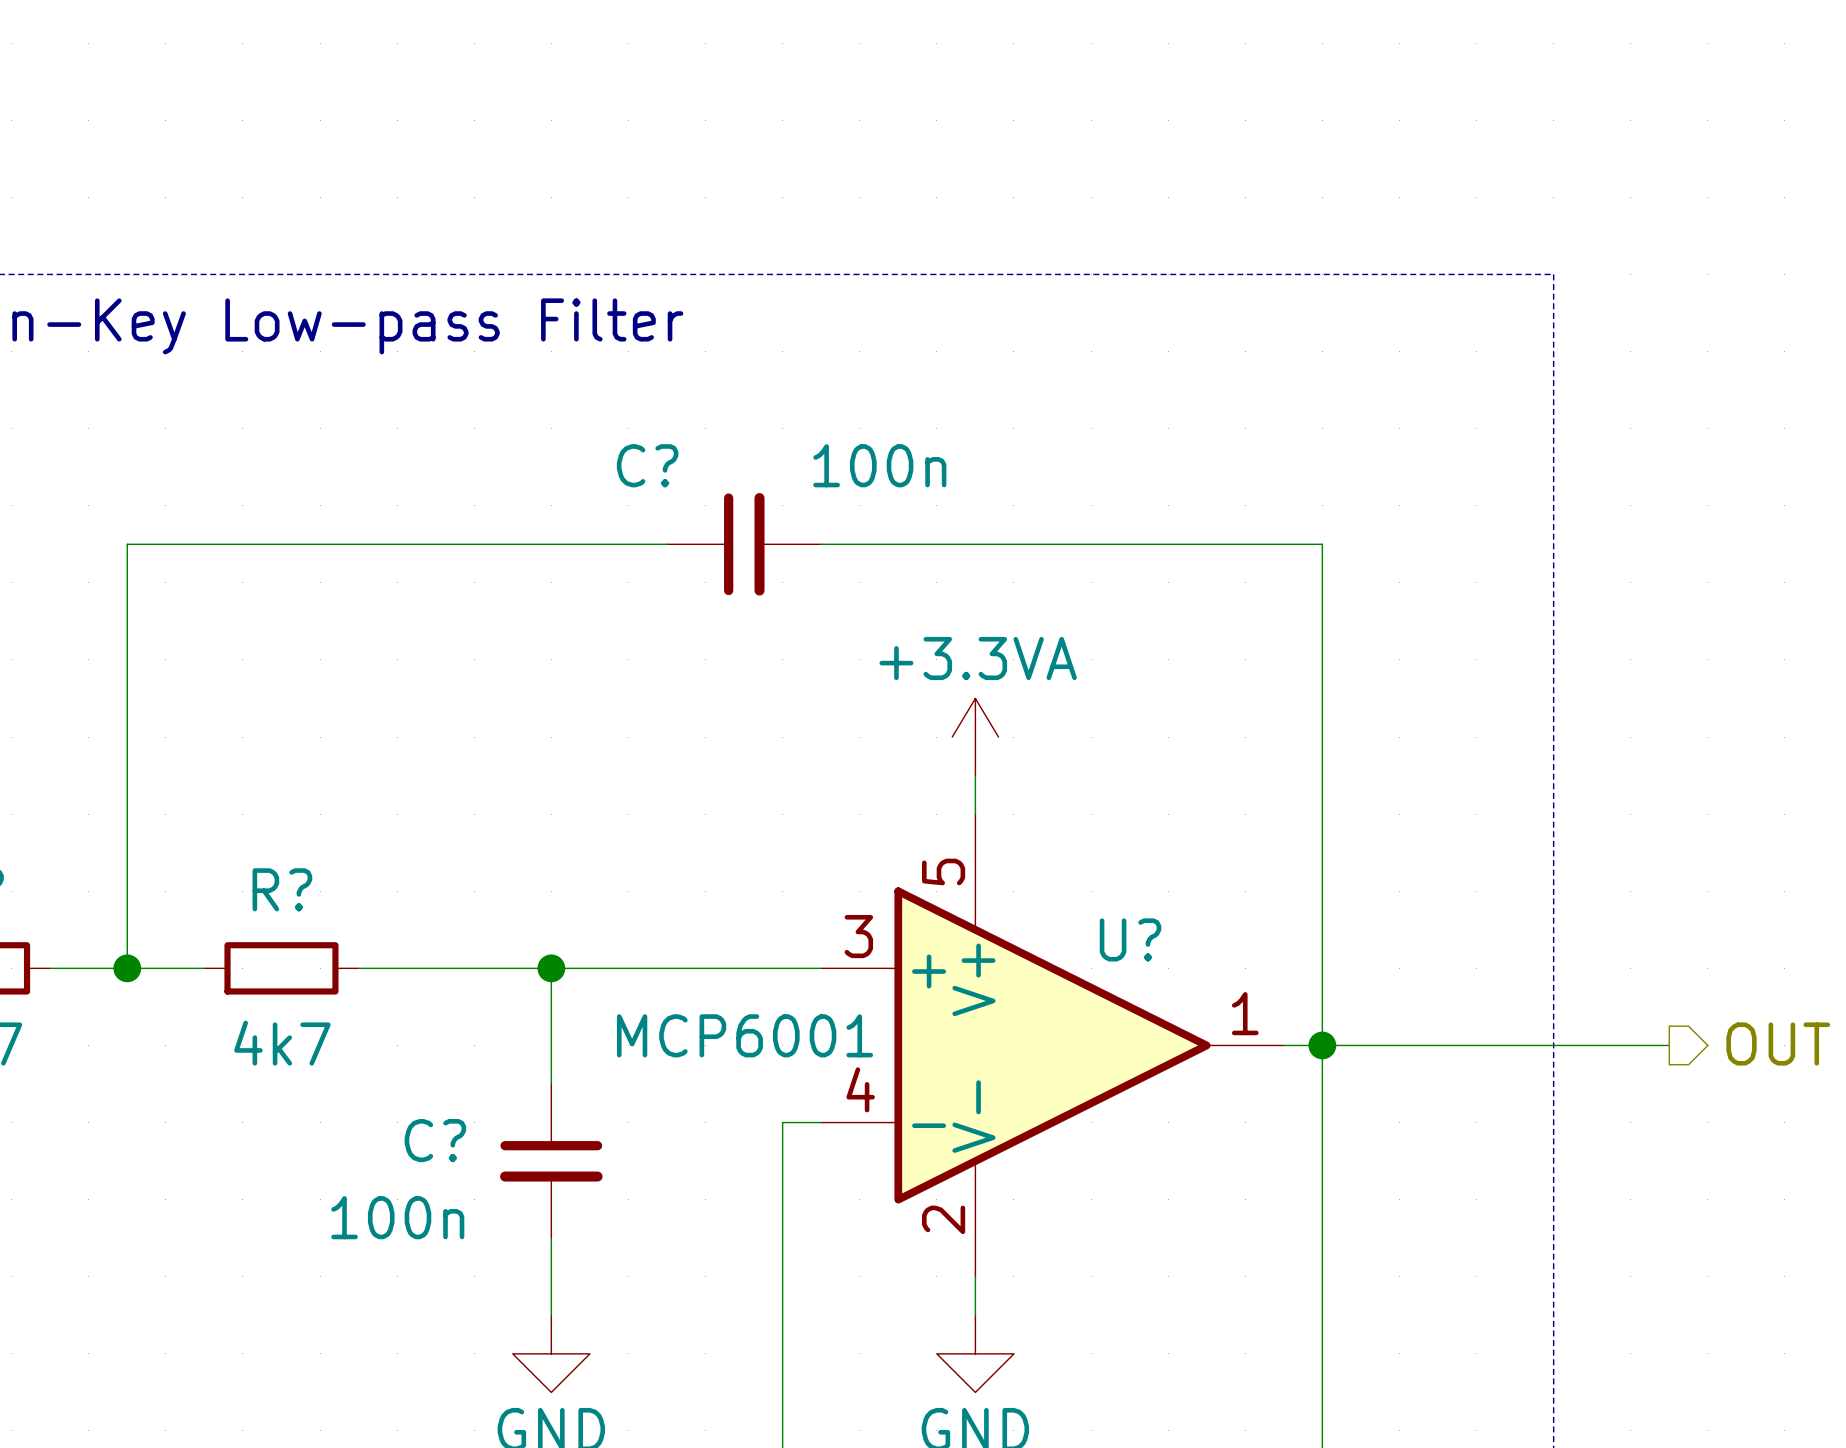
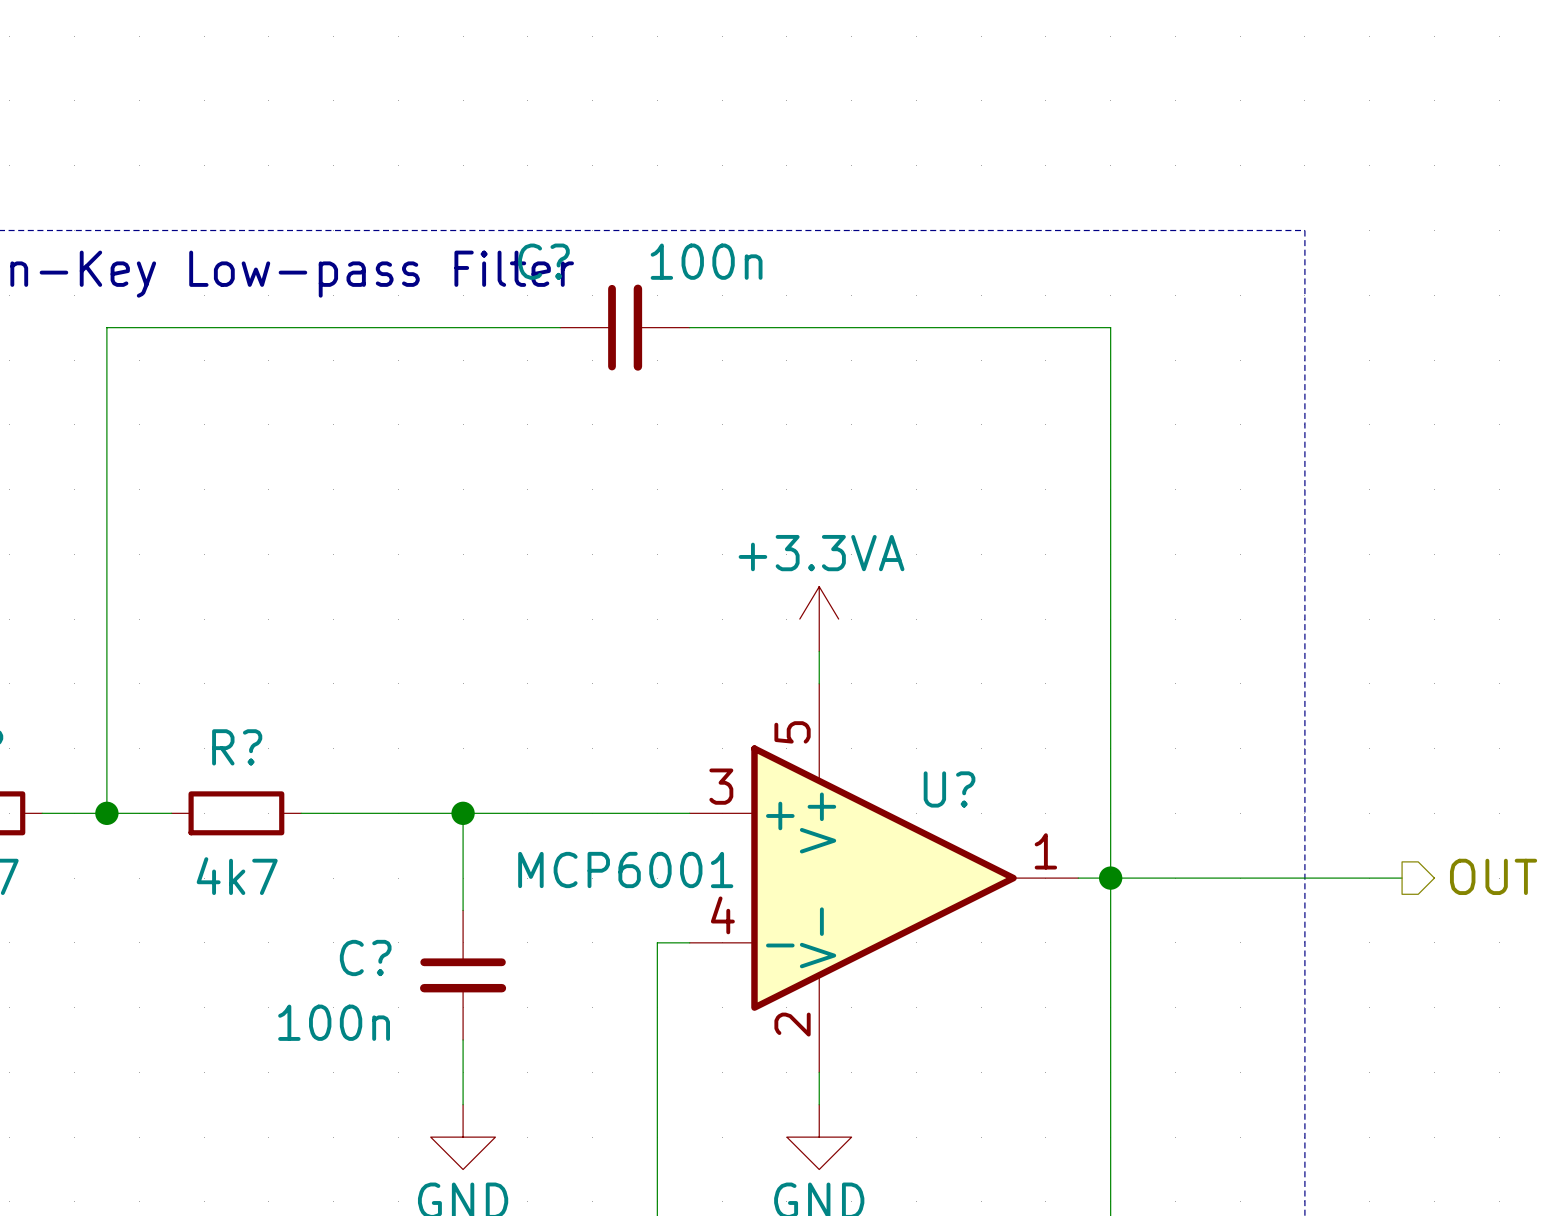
C? value position: 100n (879, 465) -> 100n (706, 261)
wire: (127, 544) (666, 544) -> (106, 457) (106, 327) (560, 327)
C? position: (744, 544) -> (624, 327)
wire: (821, 544) (1322, 544) -> (689, 327) (1110, 327) (1110, 457)

